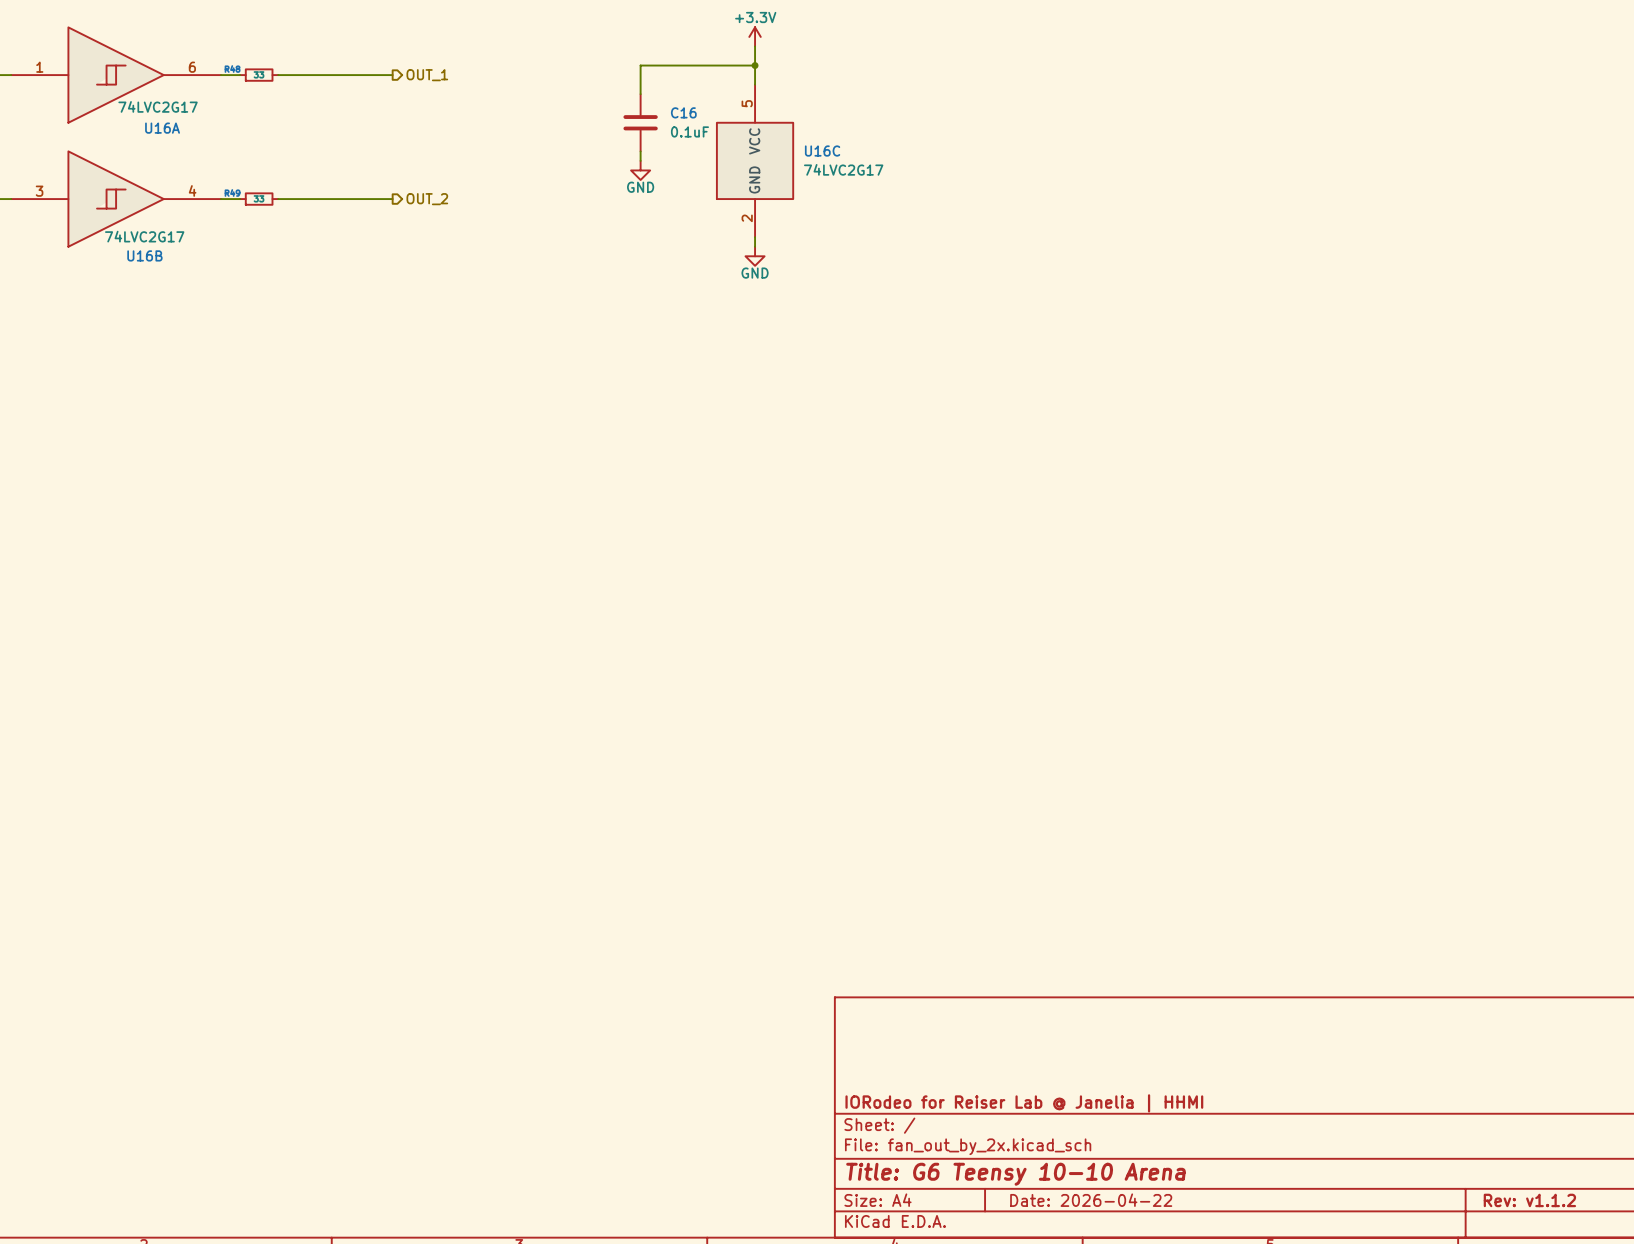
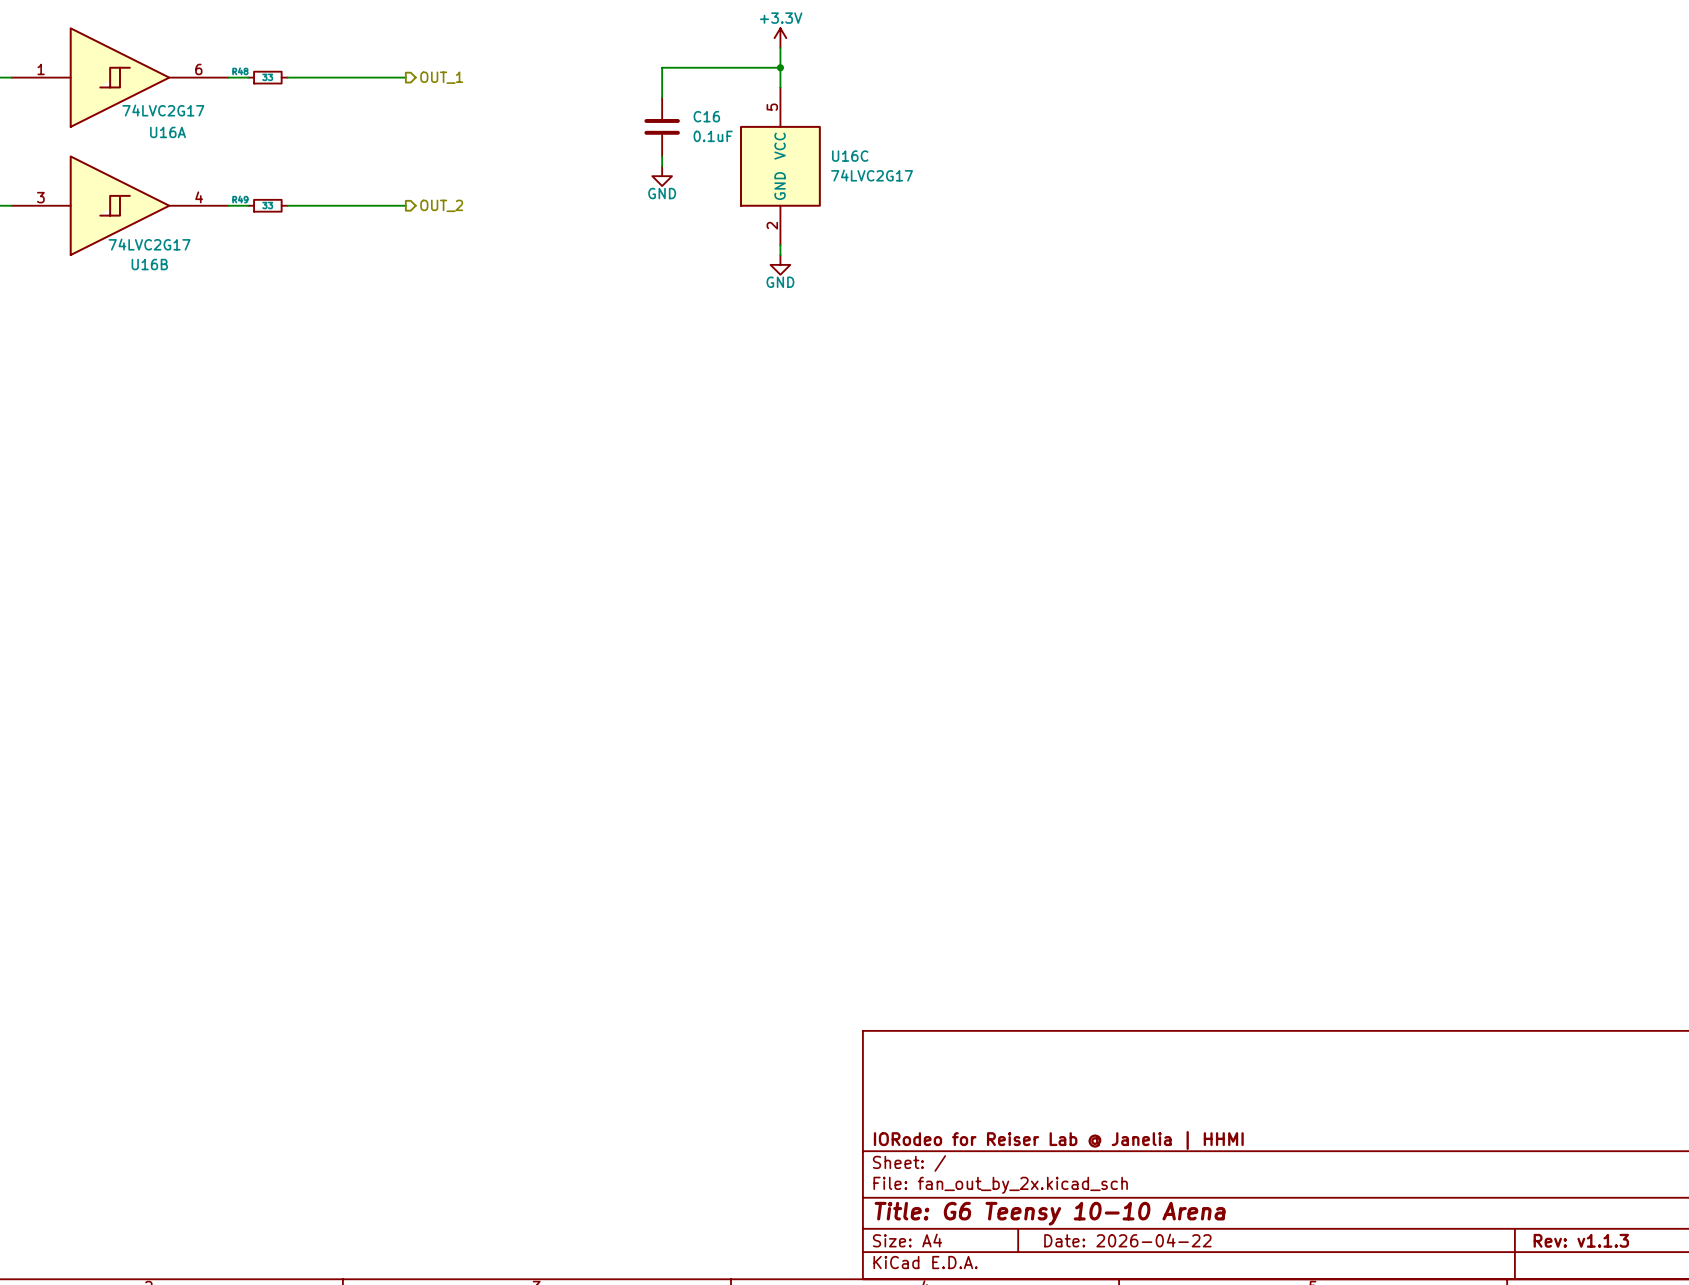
title block: Rev: v1.1.2 (1529, 1200) -> Rev: v1.1.3 (1581, 1240)

